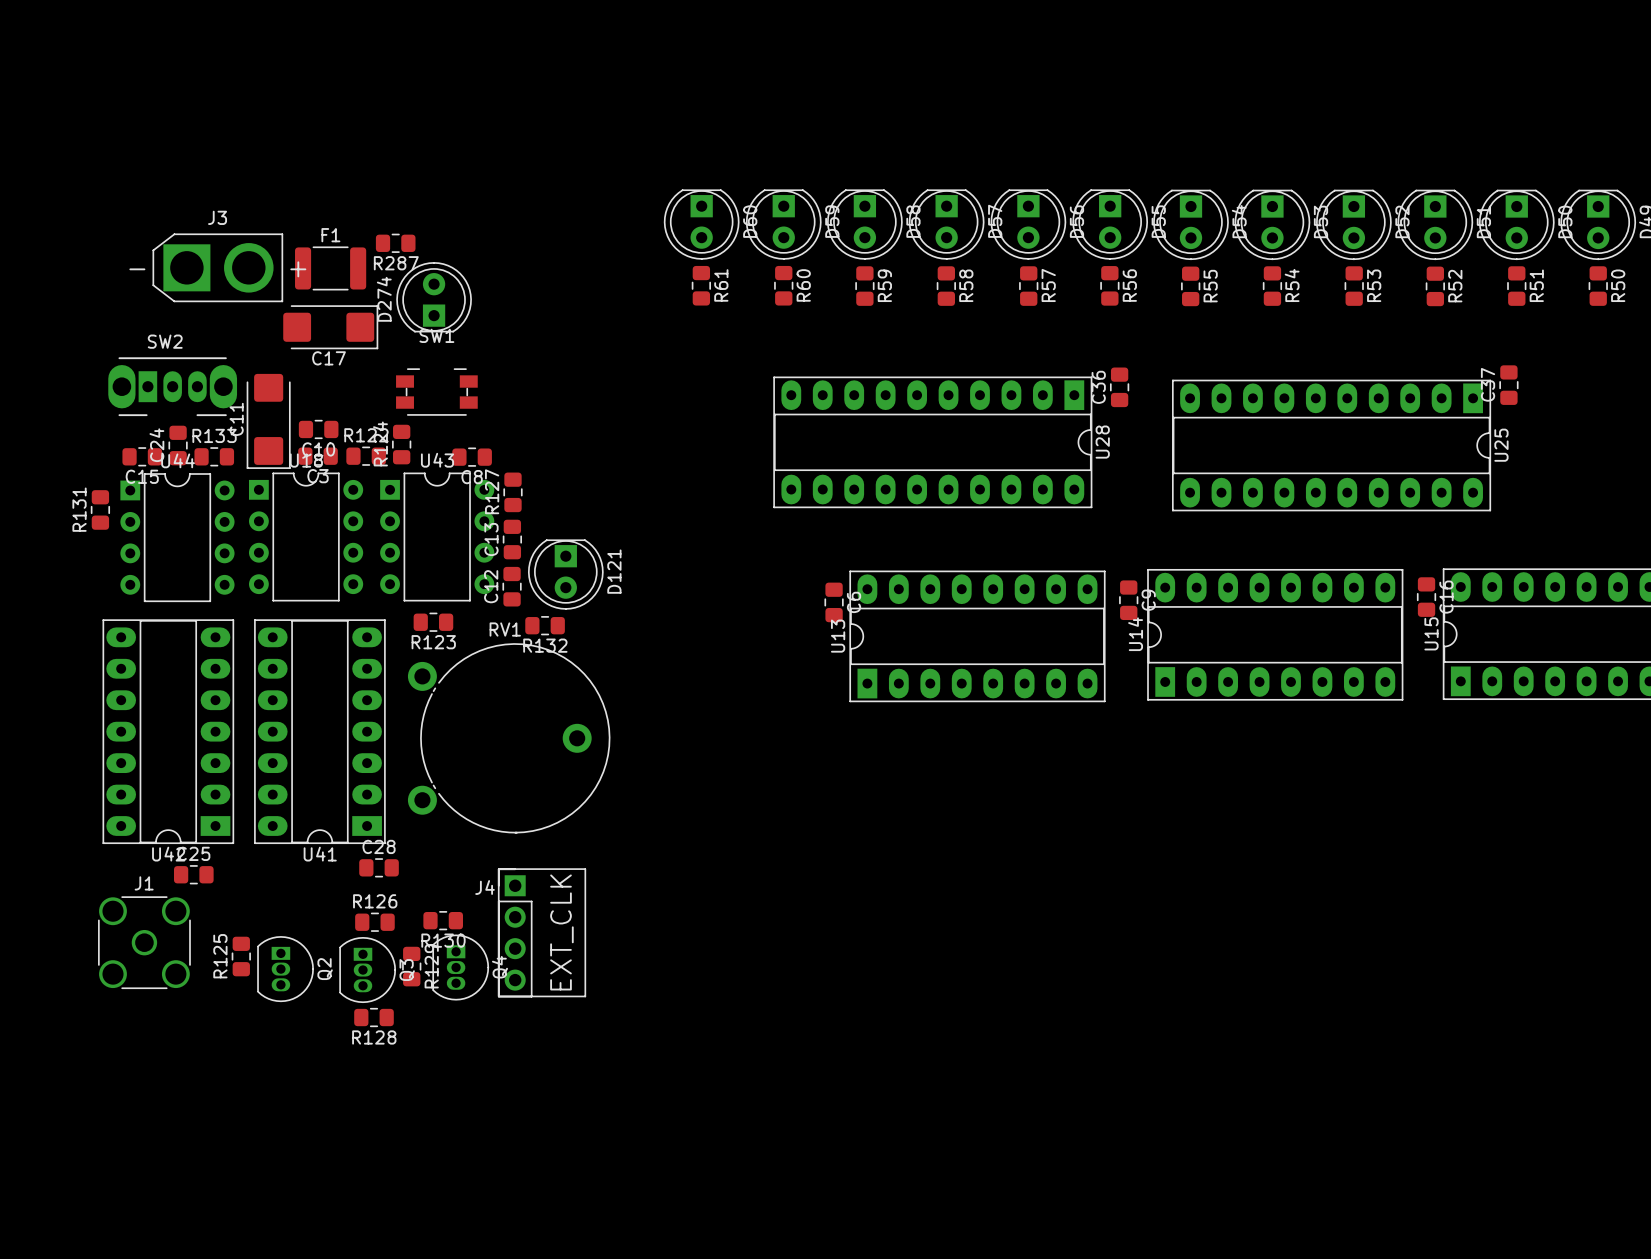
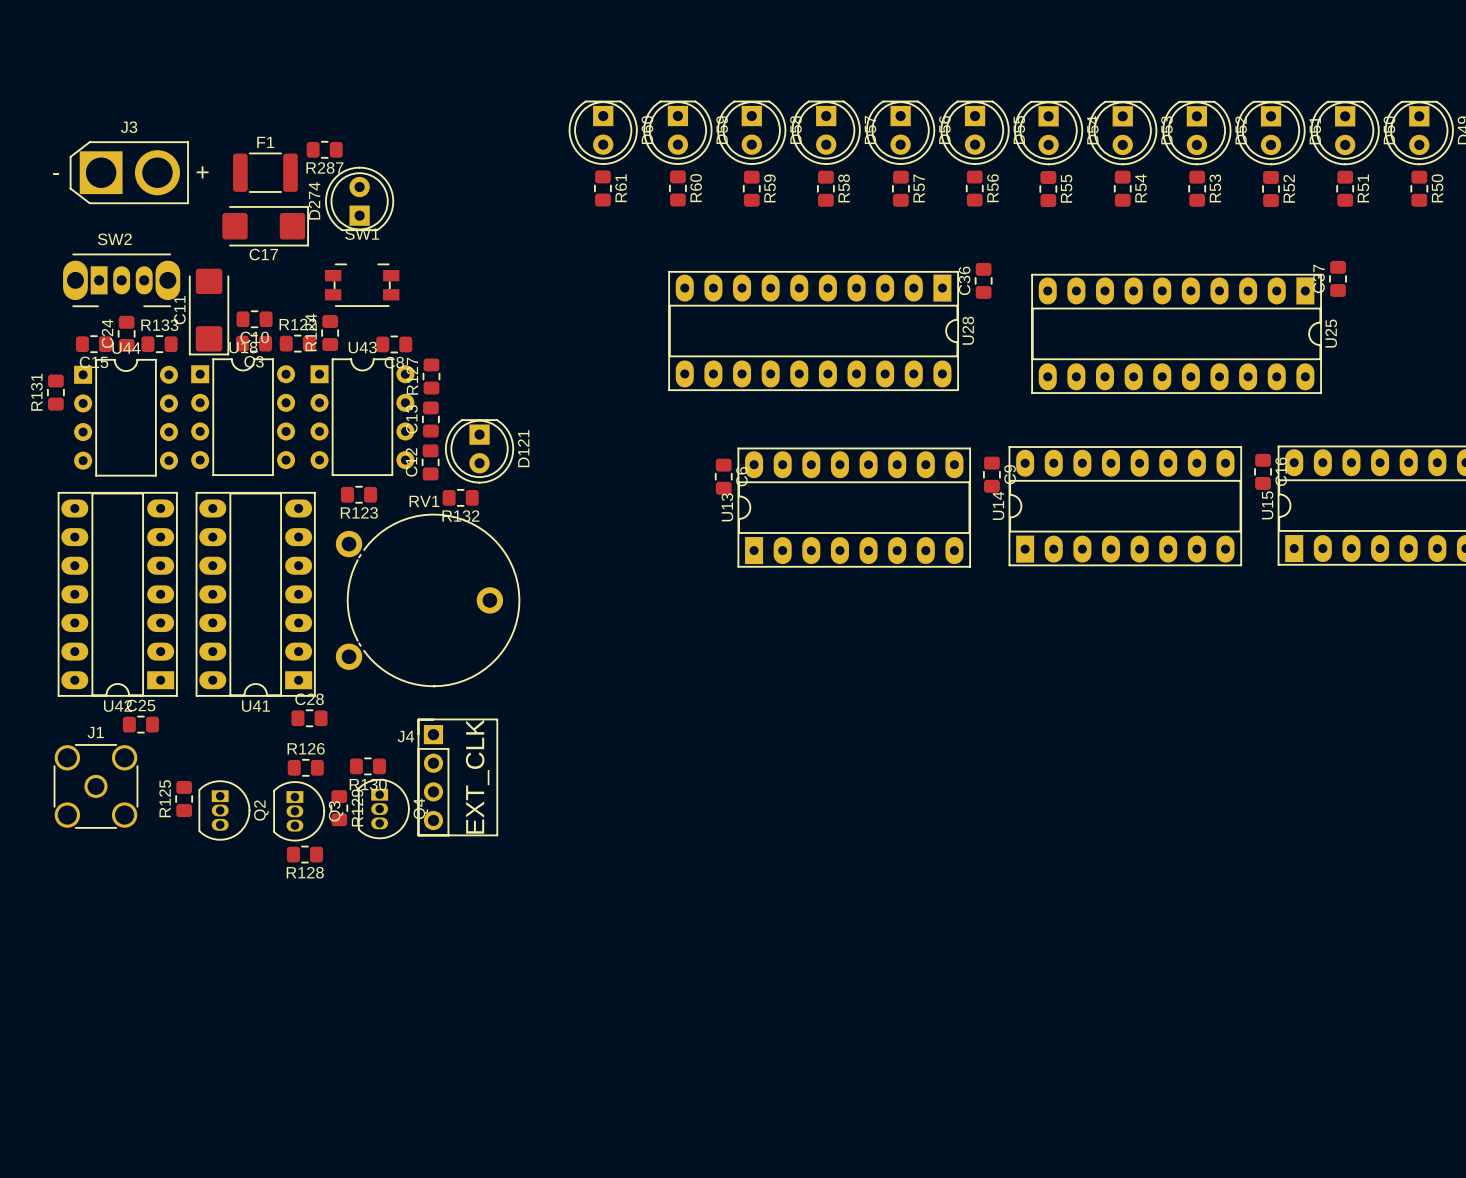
J3 position: (217, 267) -> (129, 172)

